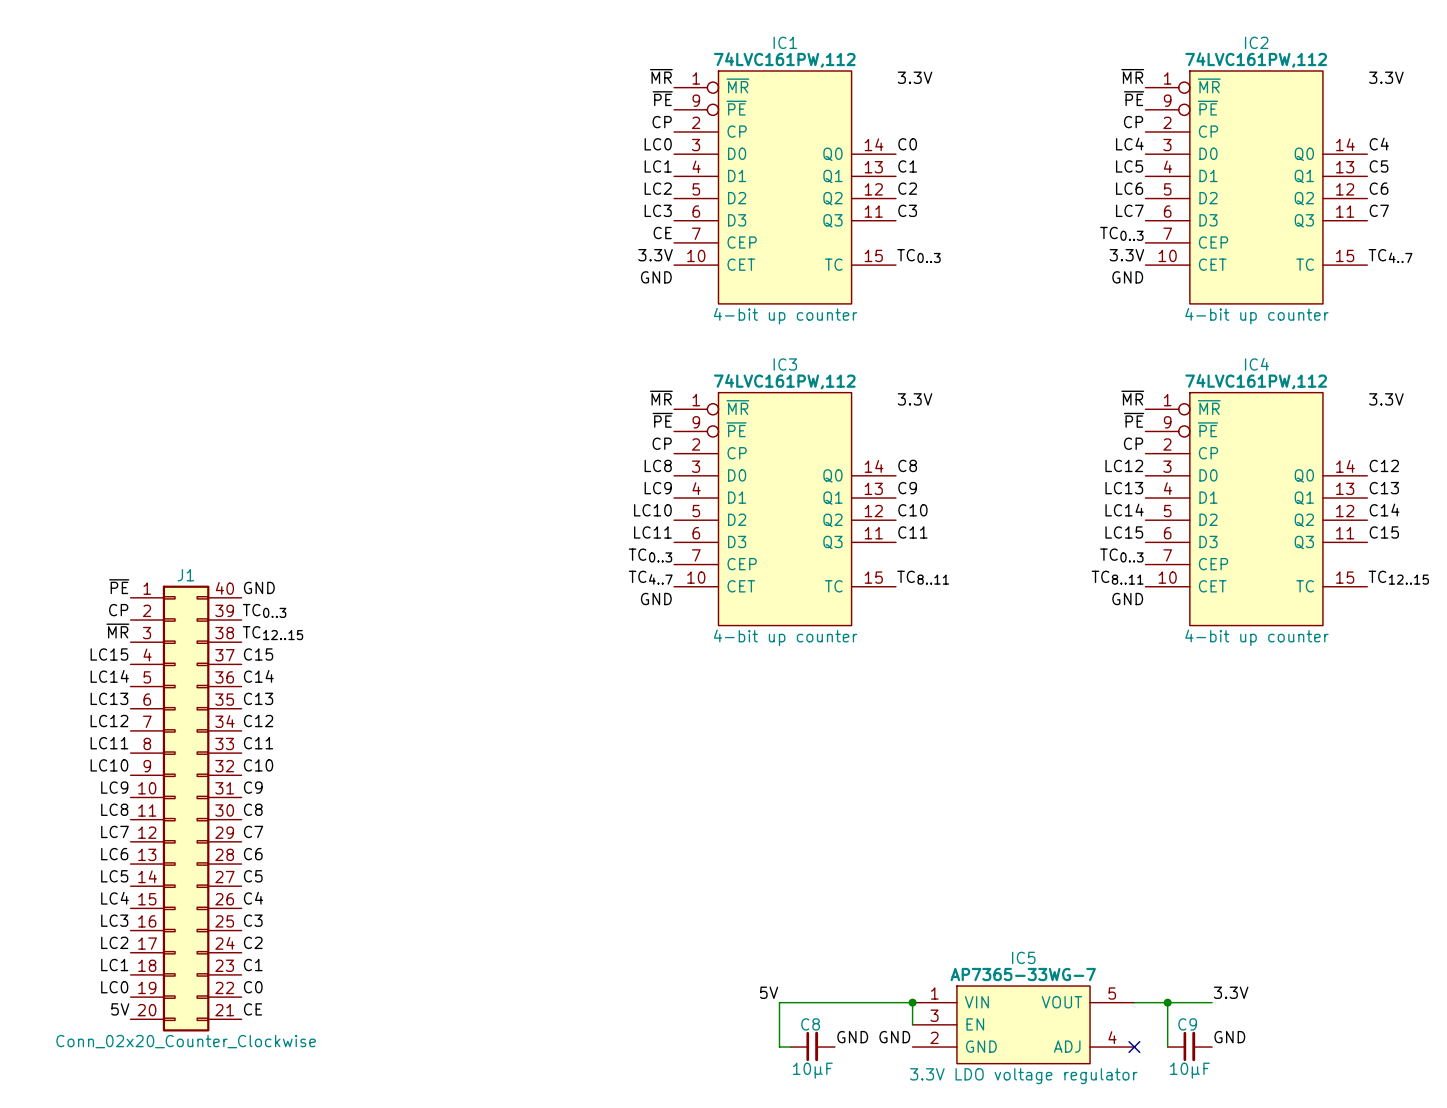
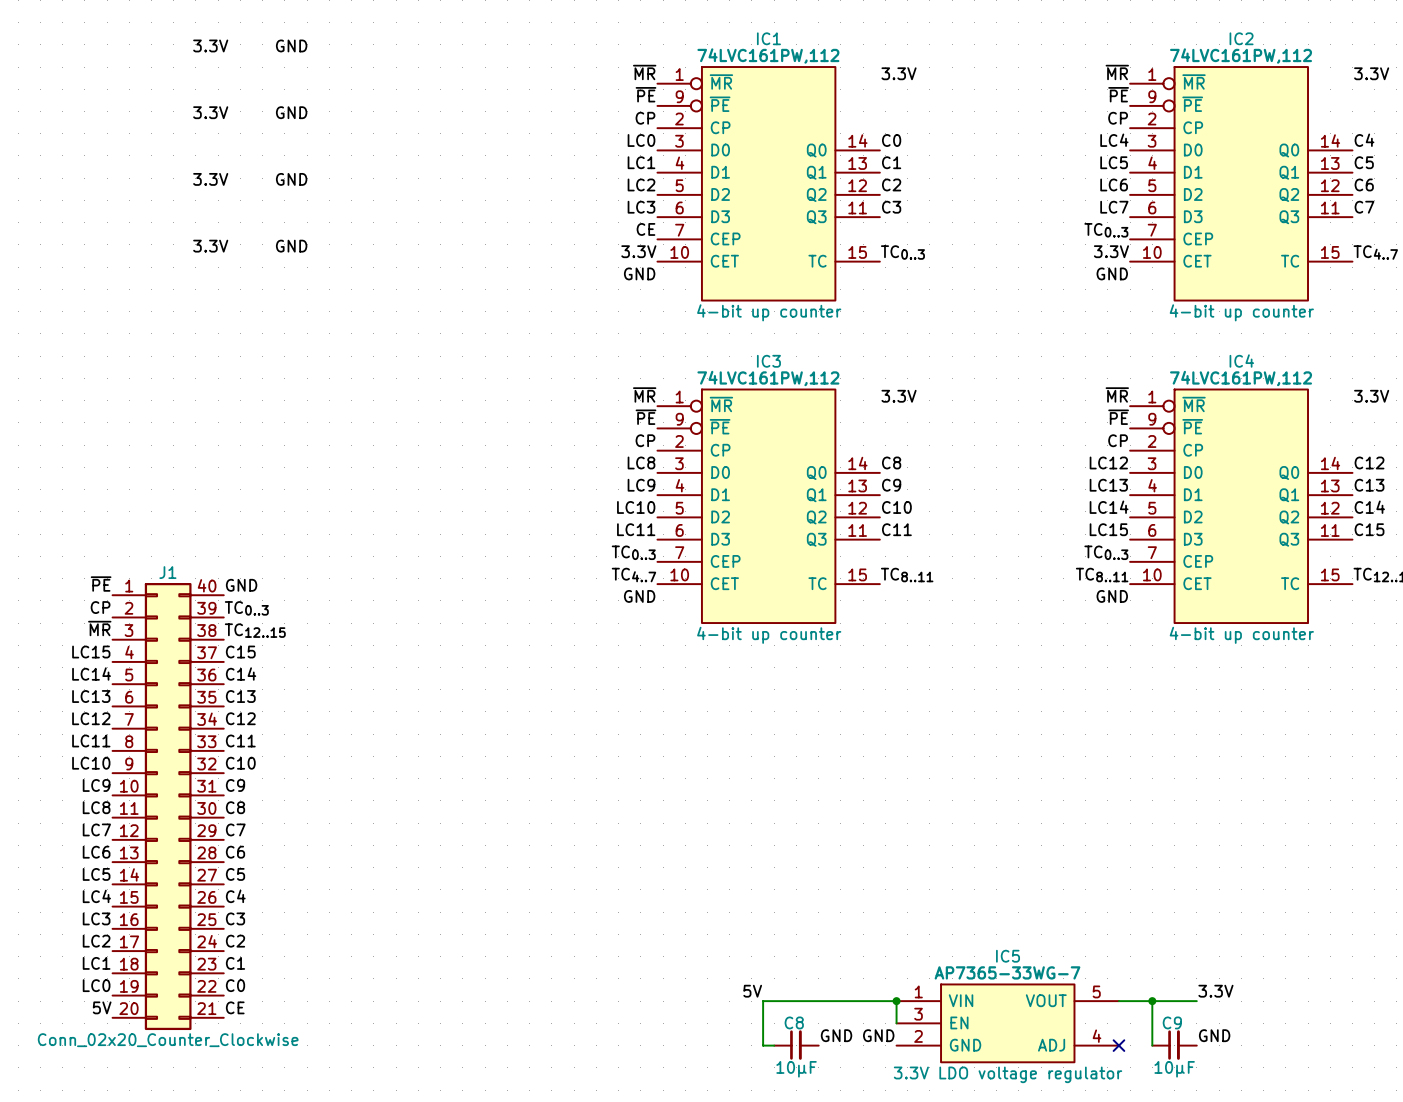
label: none -> 3.3V (210, 45)
label: none -> GND (291, 45)
label: none -> 3.3V (210, 112)
label: none -> GND (291, 112)
label: none -> 3.3V (210, 179)
label: none -> GND (291, 179)
label: none -> 3.3V (210, 246)
label: none -> GND (291, 246)

